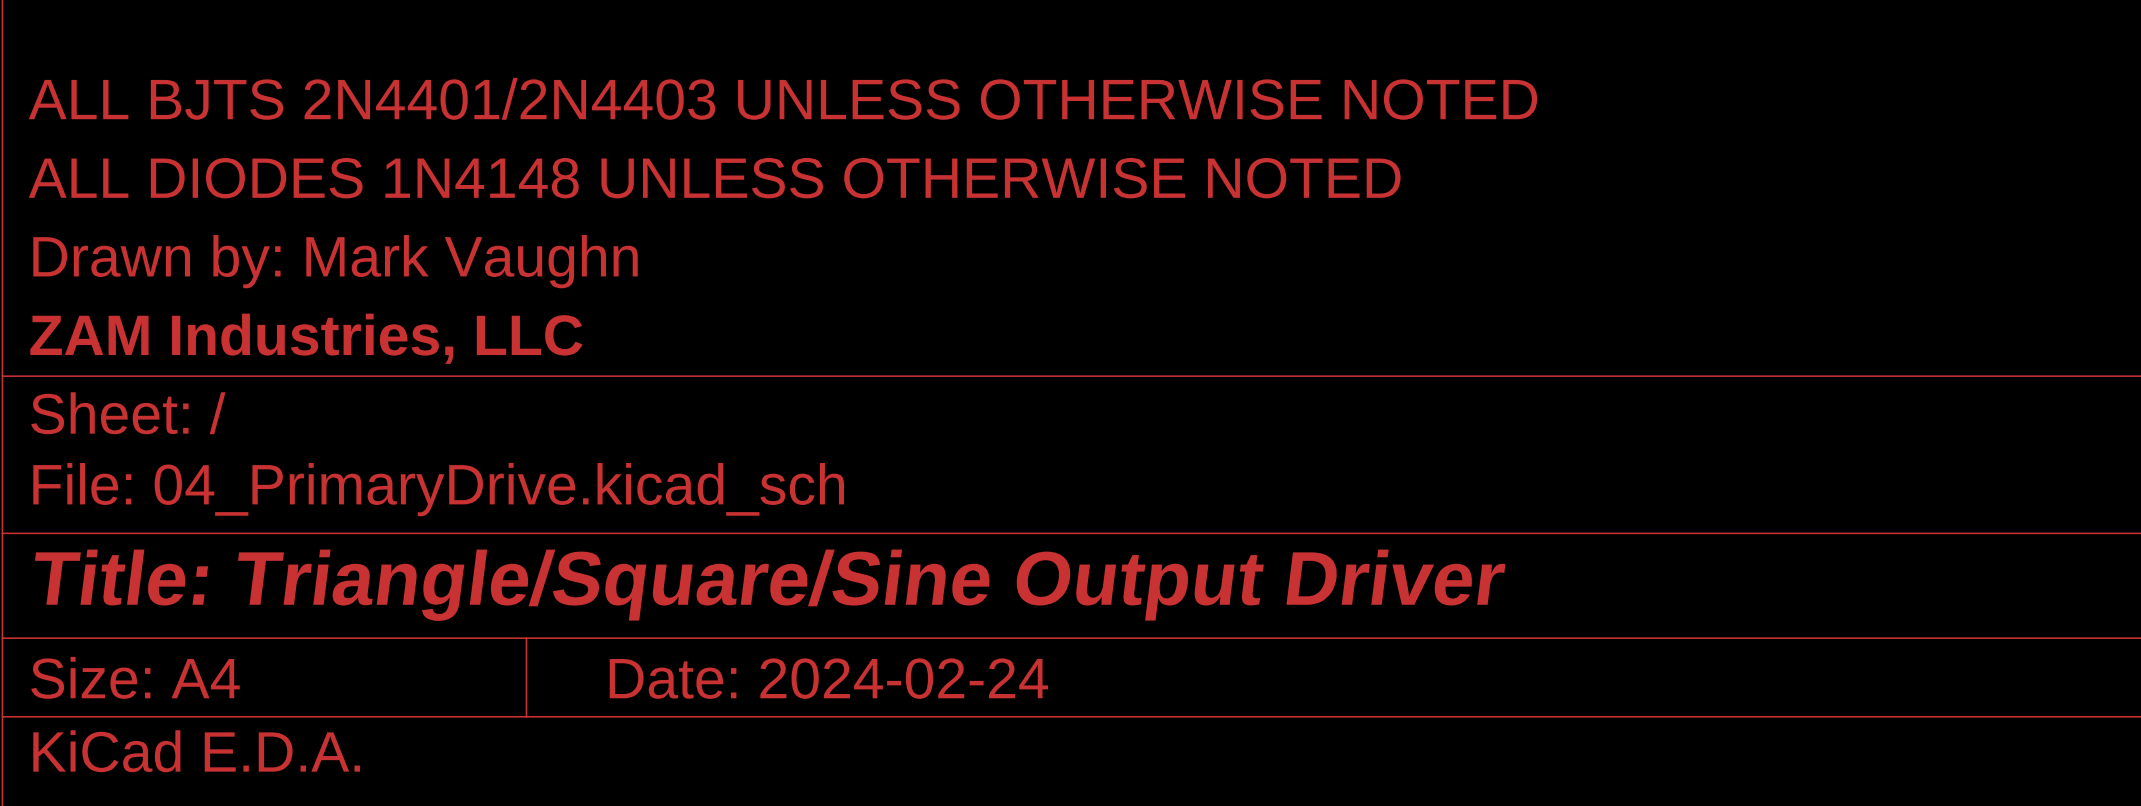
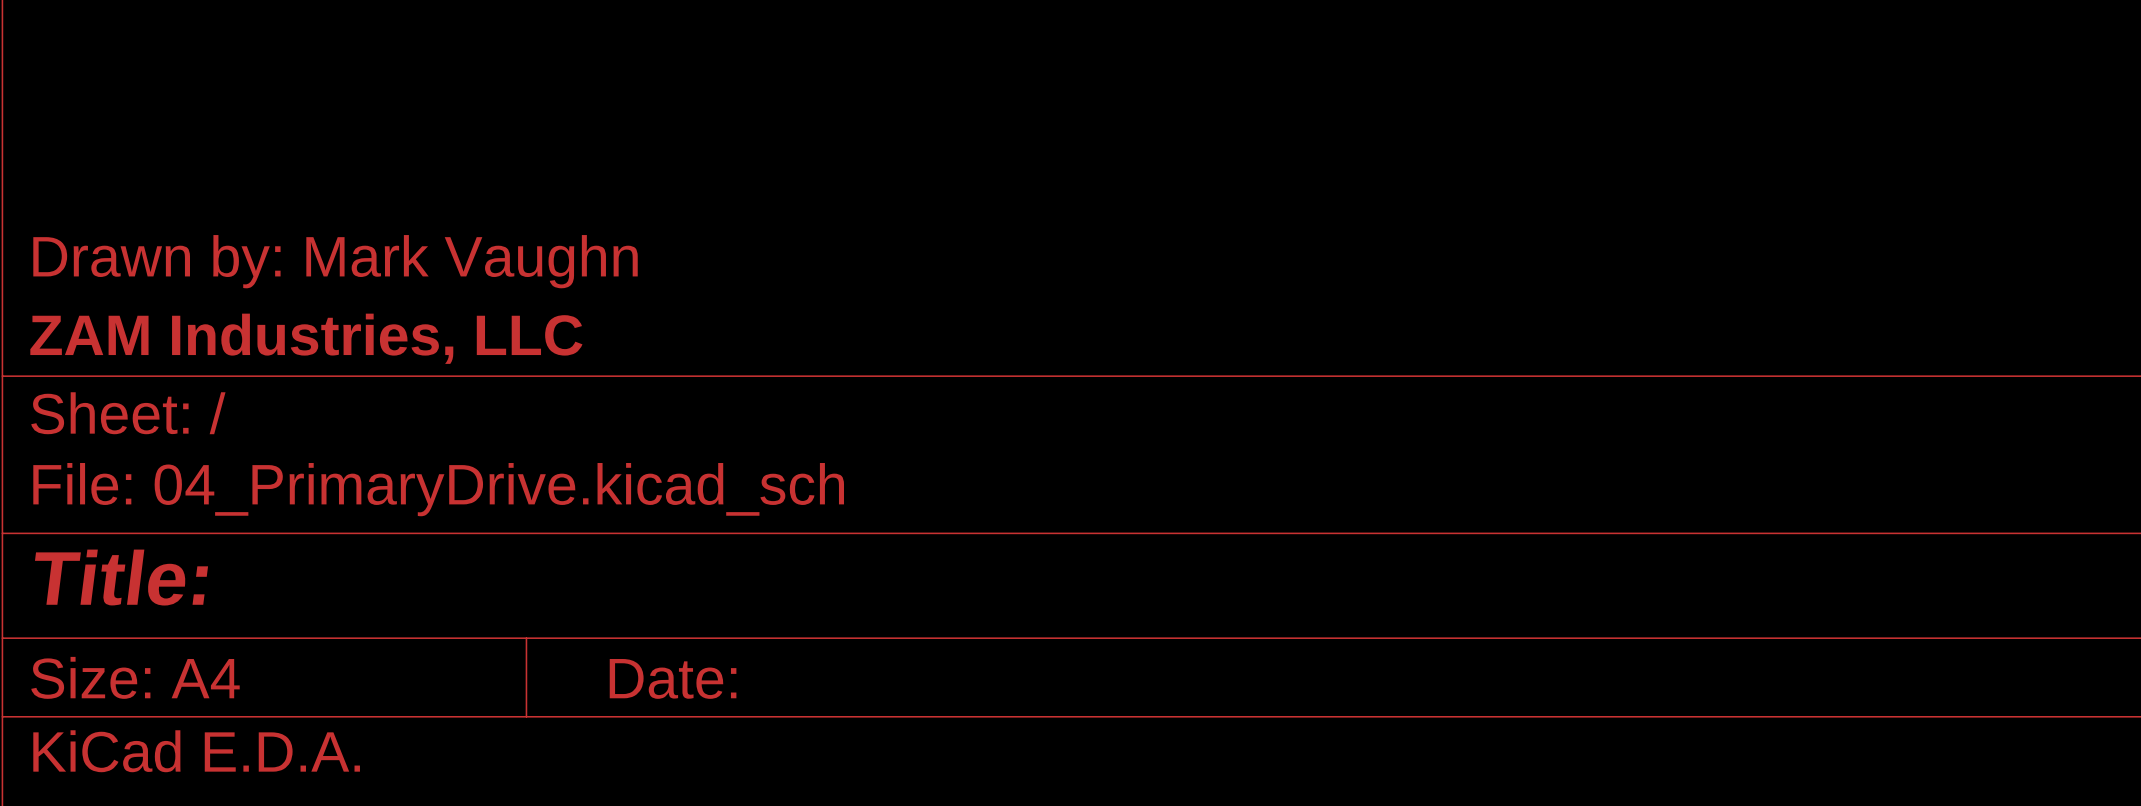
title block: ALL BJTS 2N4401/2N4403 UNLESS OTHERWISE NOTED (782, 98) -> none
title block: ALL DIODES 1N4148 UNLESS OTHERWISE NOTED (714, 178) -> none
title block: Title: Triangle/Square/Sine Output Driver (770, 585) -> Title: (121, 577)
title block: Date: 2024-02-24 (828, 678) -> Date: (673, 678)

